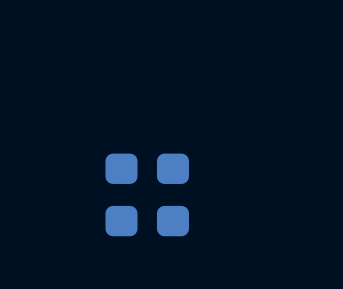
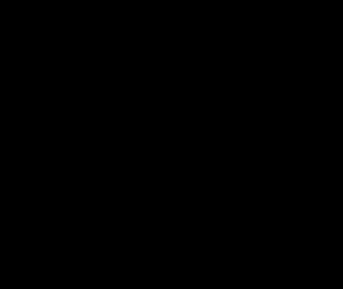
part: (121, 194) -> none
part: (172, 194) -> none

